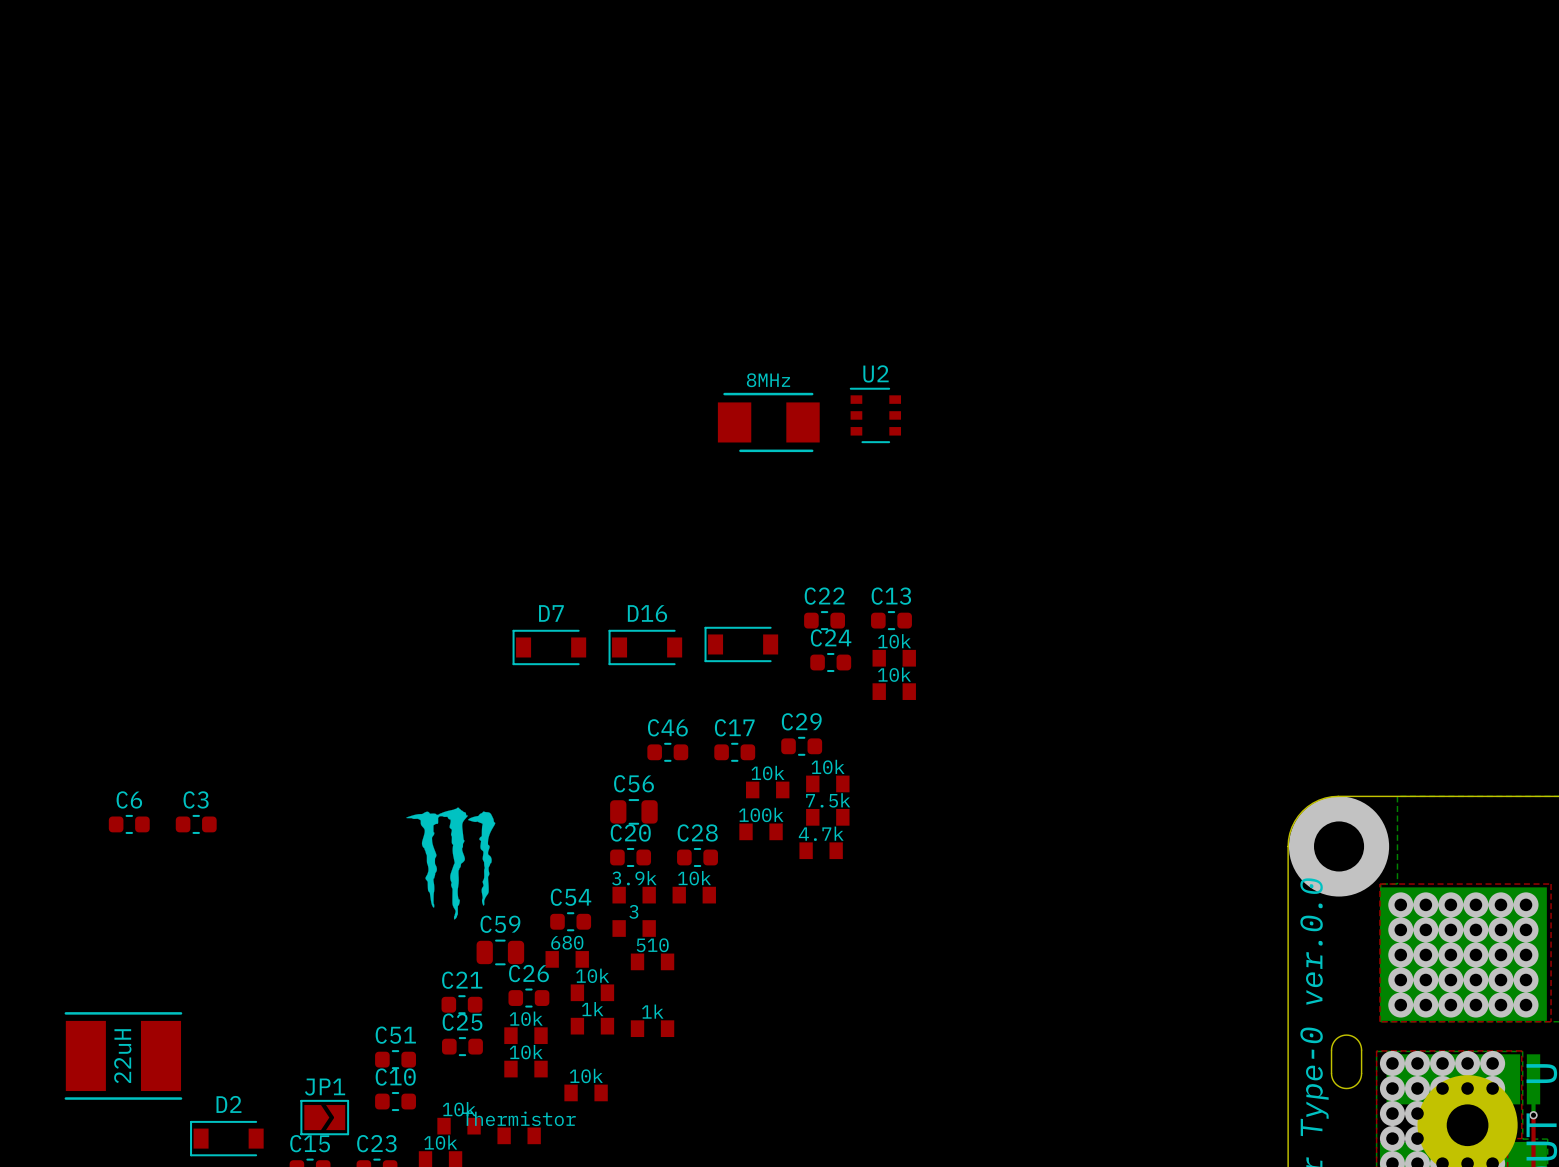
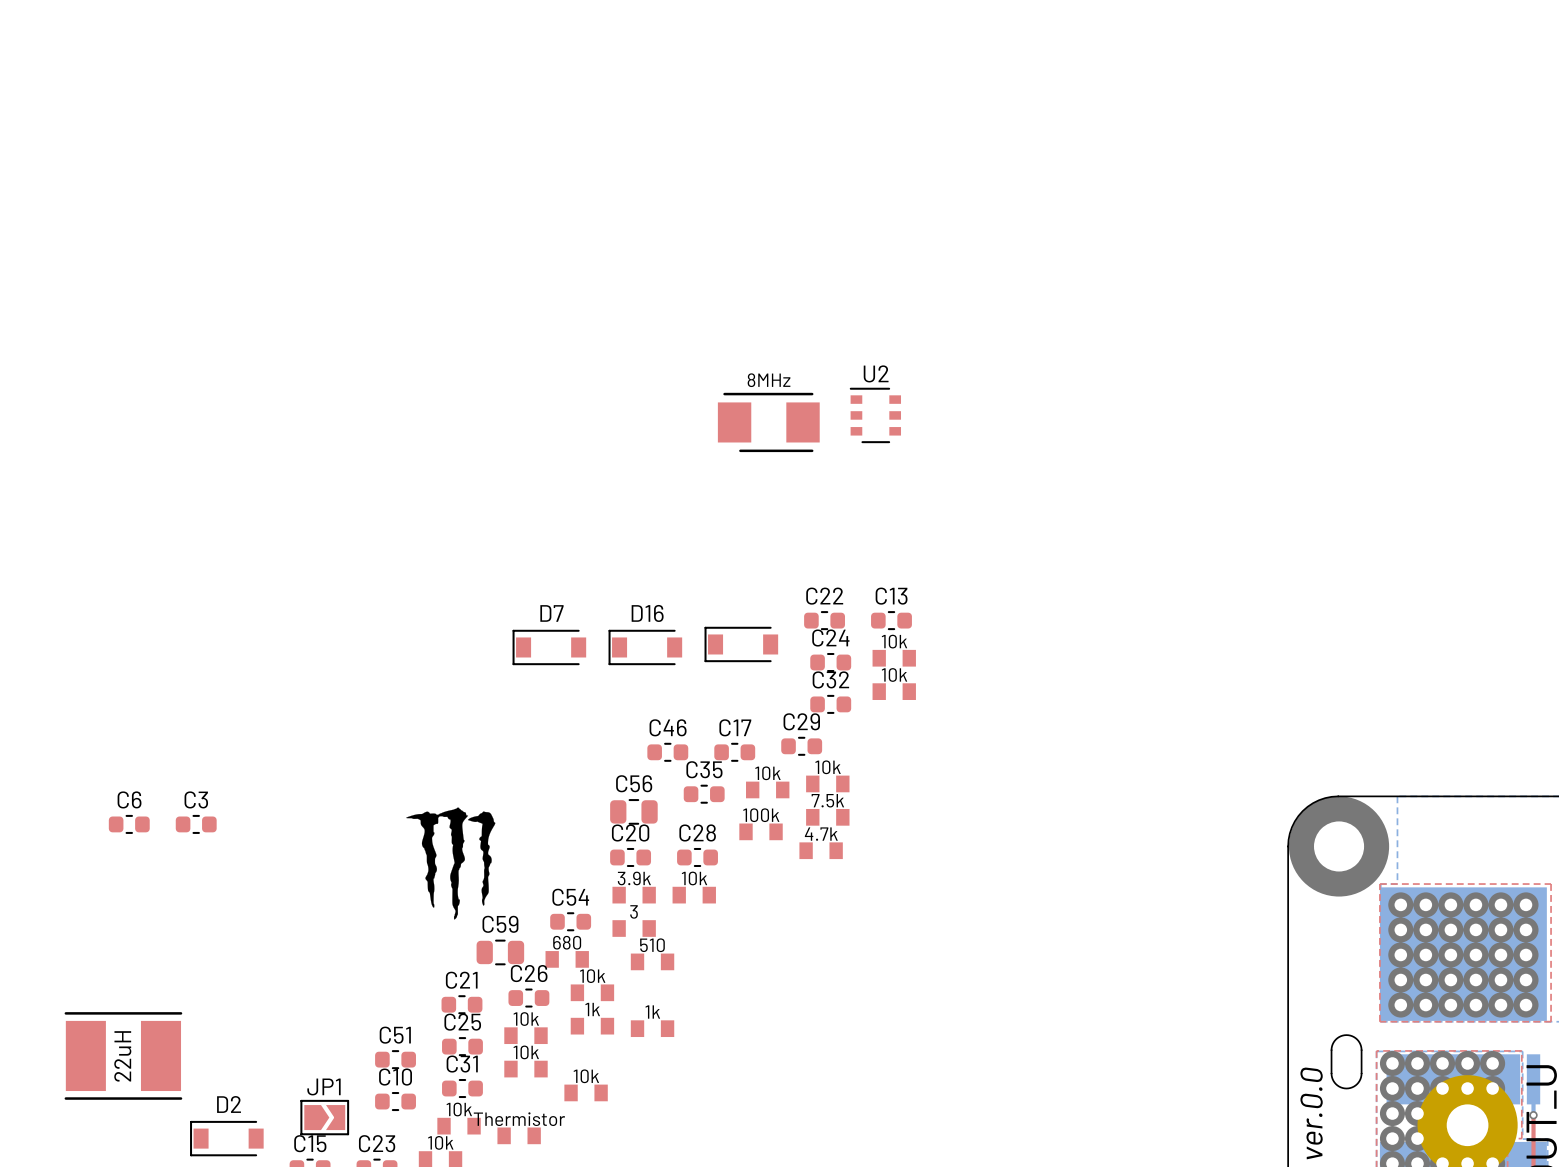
C32: none -> (830, 704)
C35: none -> (704, 794)
C31: none -> (462, 1088)

